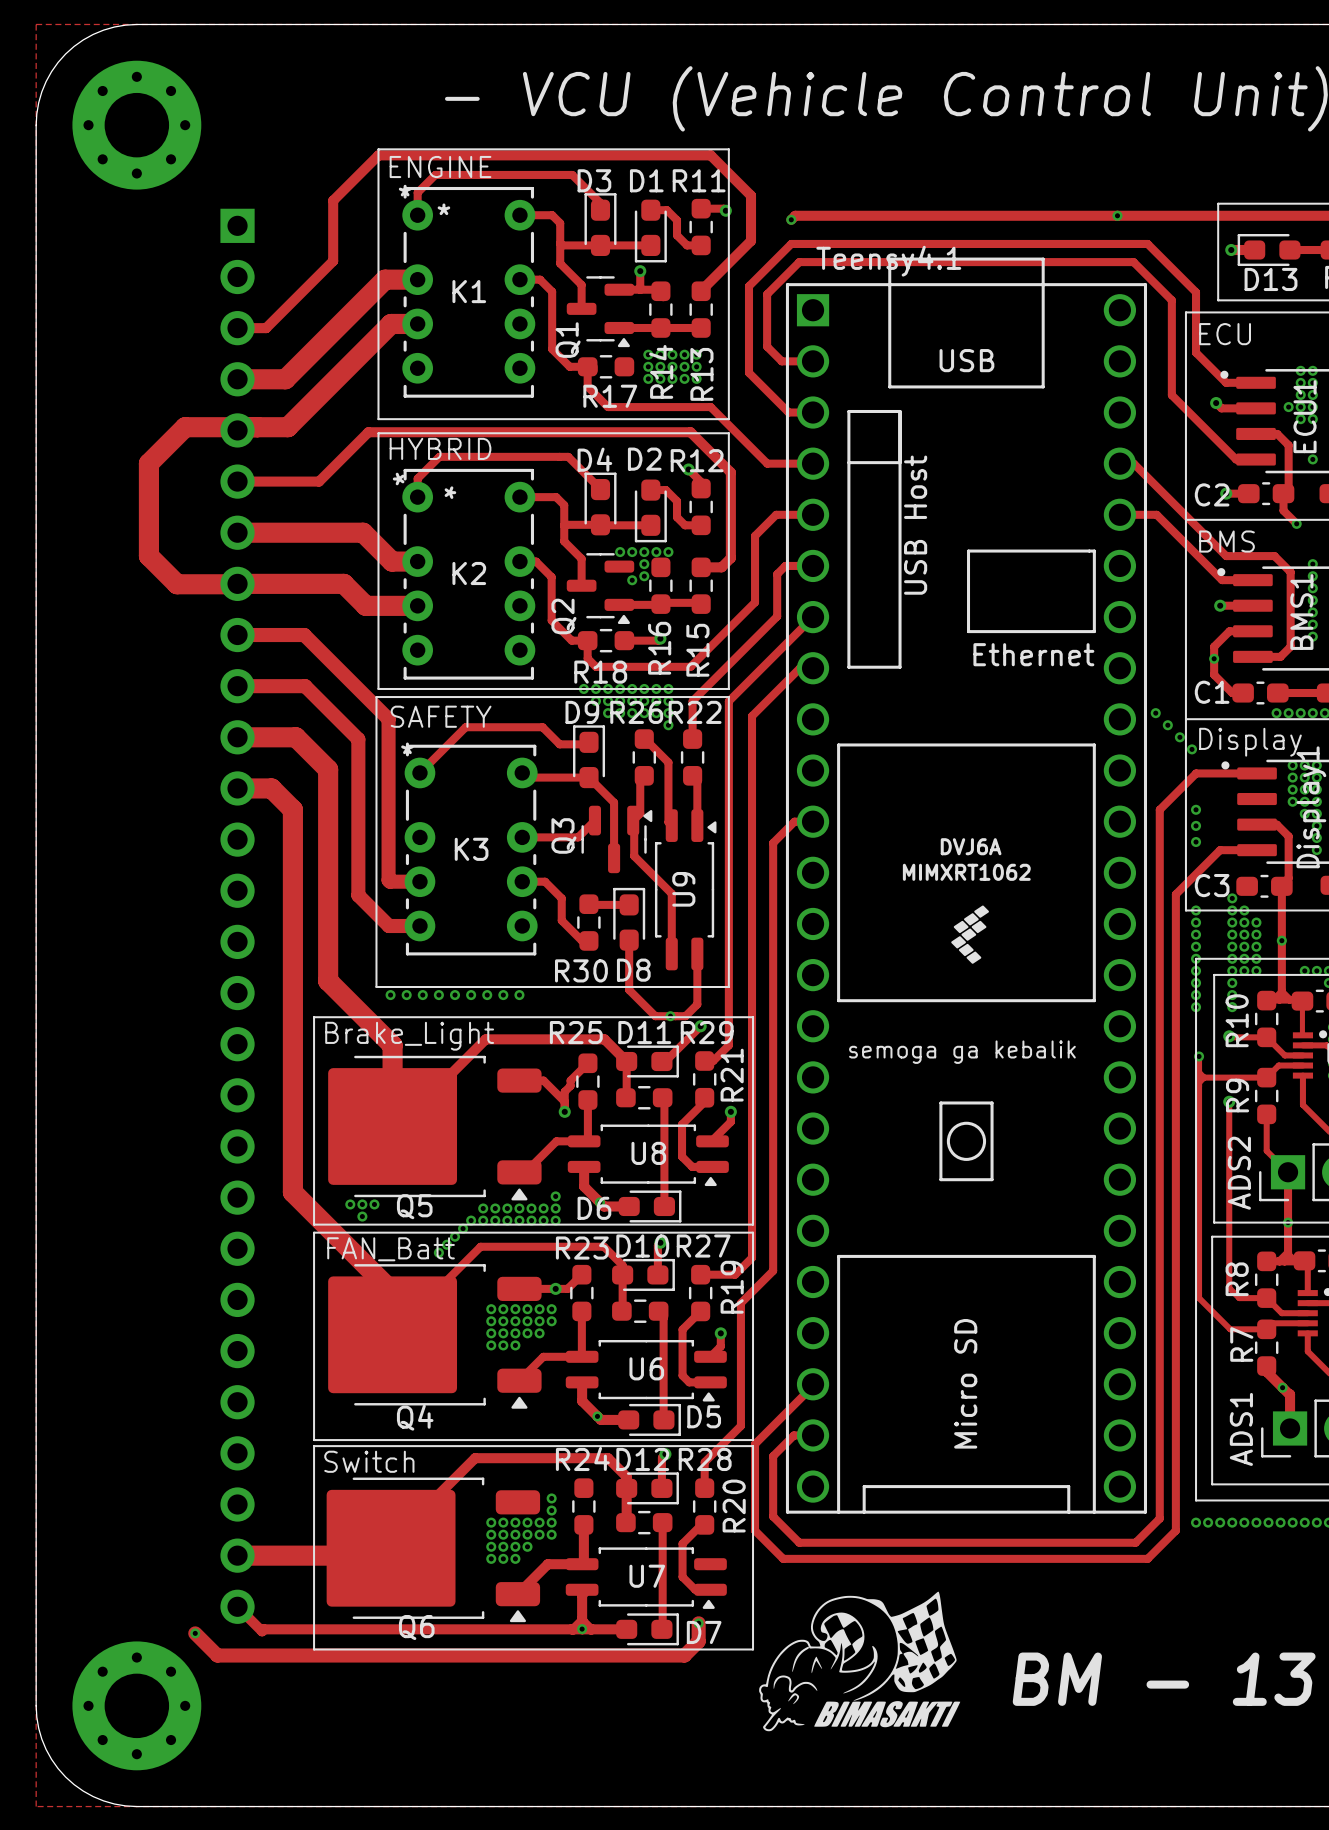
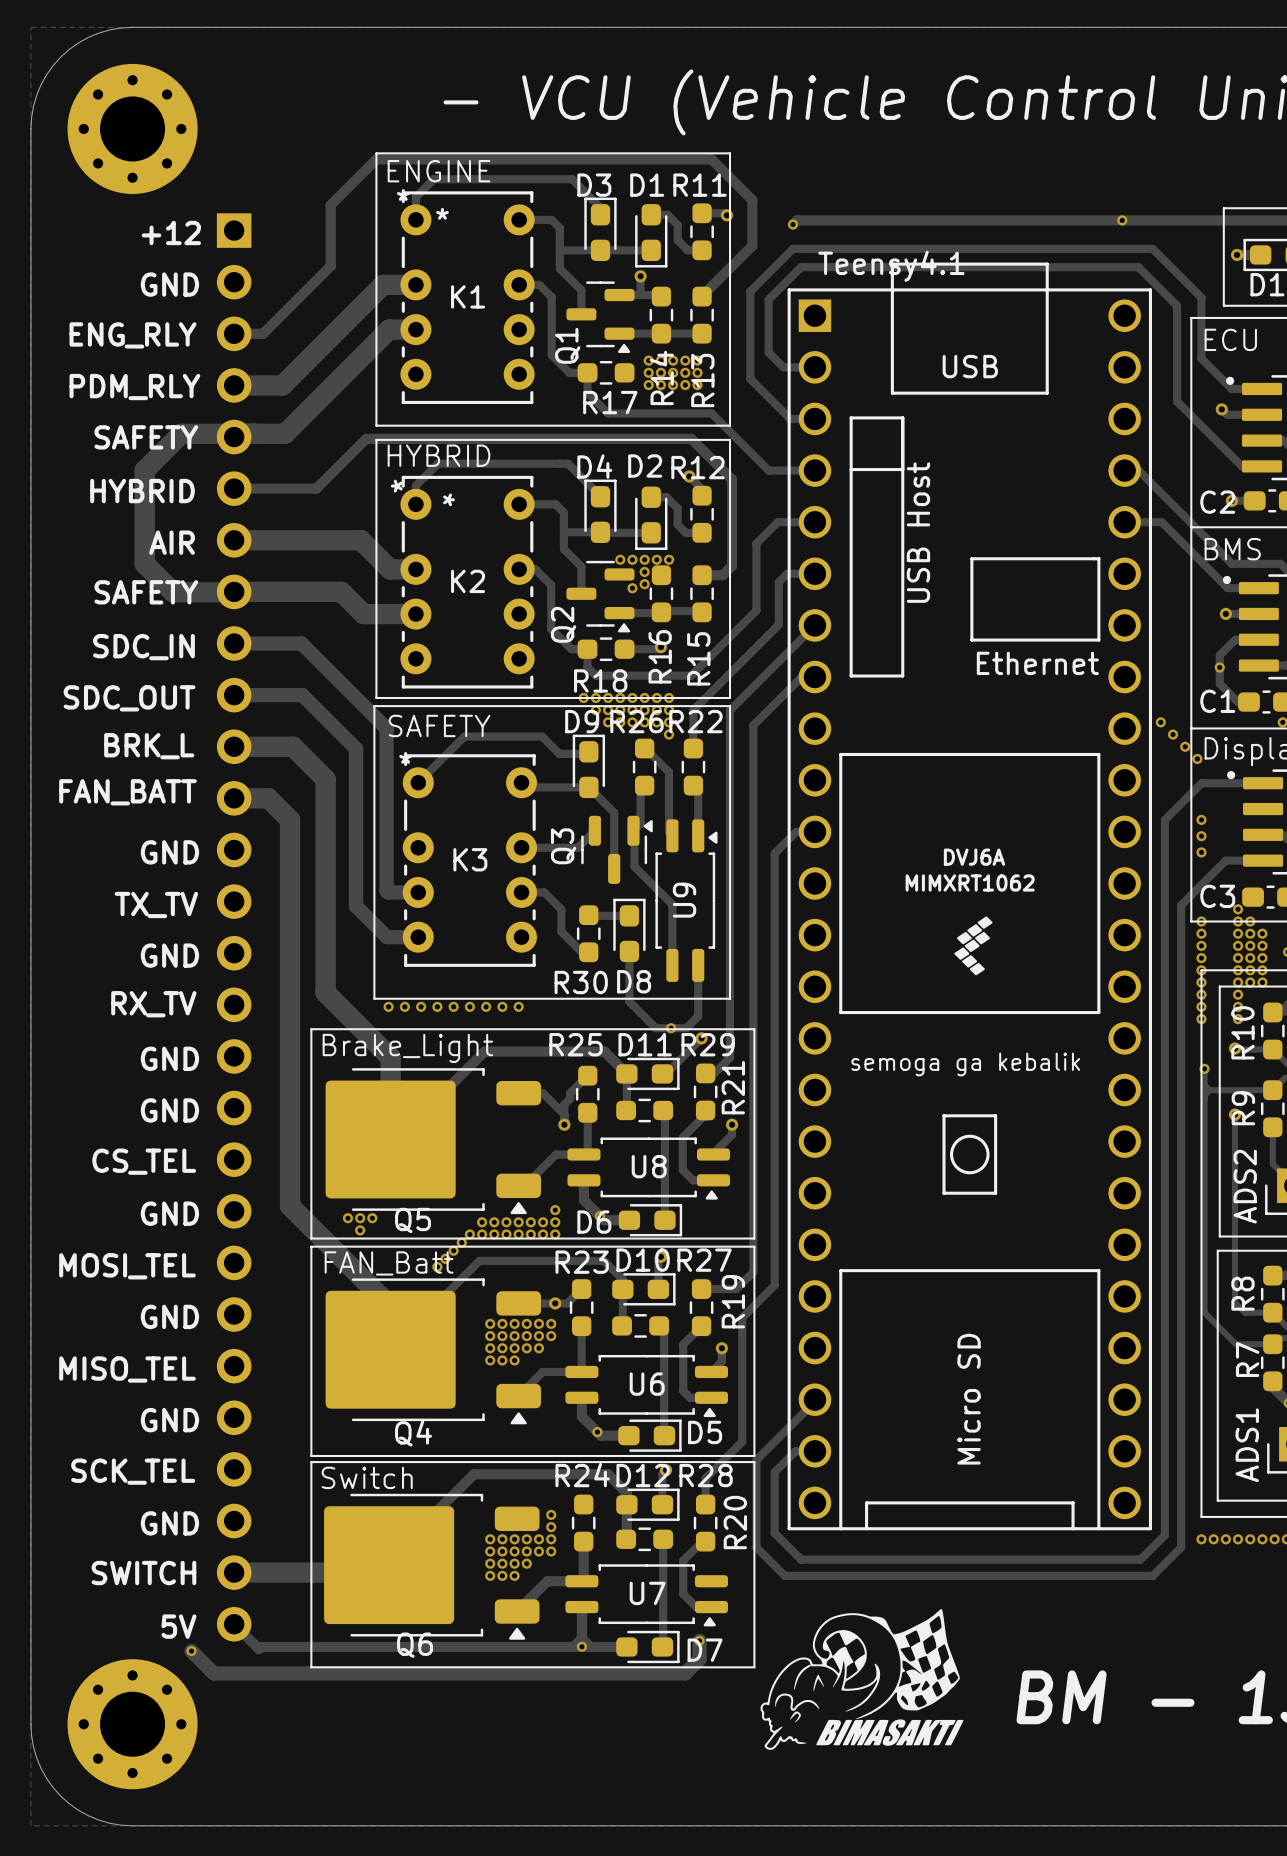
text: none -> +12 (171, 232)
text: none -> GND (169, 284)
text: none -> ENG_RLY (132, 335)
text: none -> PDM_RLY (134, 387)
text: none -> SAFETY (146, 437)
text: none -> HYBRID (142, 491)
text: none -> AIR (172, 542)
text: none -> SAFETY (146, 592)
text: none -> SDC_IN (144, 647)
text: none -> SDC_OUT (129, 698)
text: none -> BRK_L (149, 746)
text: none -> FAN_BATT (127, 792)
text: none -> GND (169, 852)
text: none -> TX_TV (156, 904)
text: none -> GND (169, 955)
text: none -> RX_TV (153, 1004)
text: none -> GND (169, 1058)
text: none -> GND (169, 1110)
text: none -> CS_TEL (144, 1161)
text: none -> GND (169, 1213)
text: none -> MOSI_TEL (127, 1266)
text: none -> GND (169, 1316)
text: none -> MISO_TEL (127, 1369)
text: none -> GND (169, 1420)
text: none -> SCK_TEL (133, 1471)
text: none -> GND (169, 1523)
text: none -> SWITCH (143, 1573)
text: none -> 5V (178, 1626)

